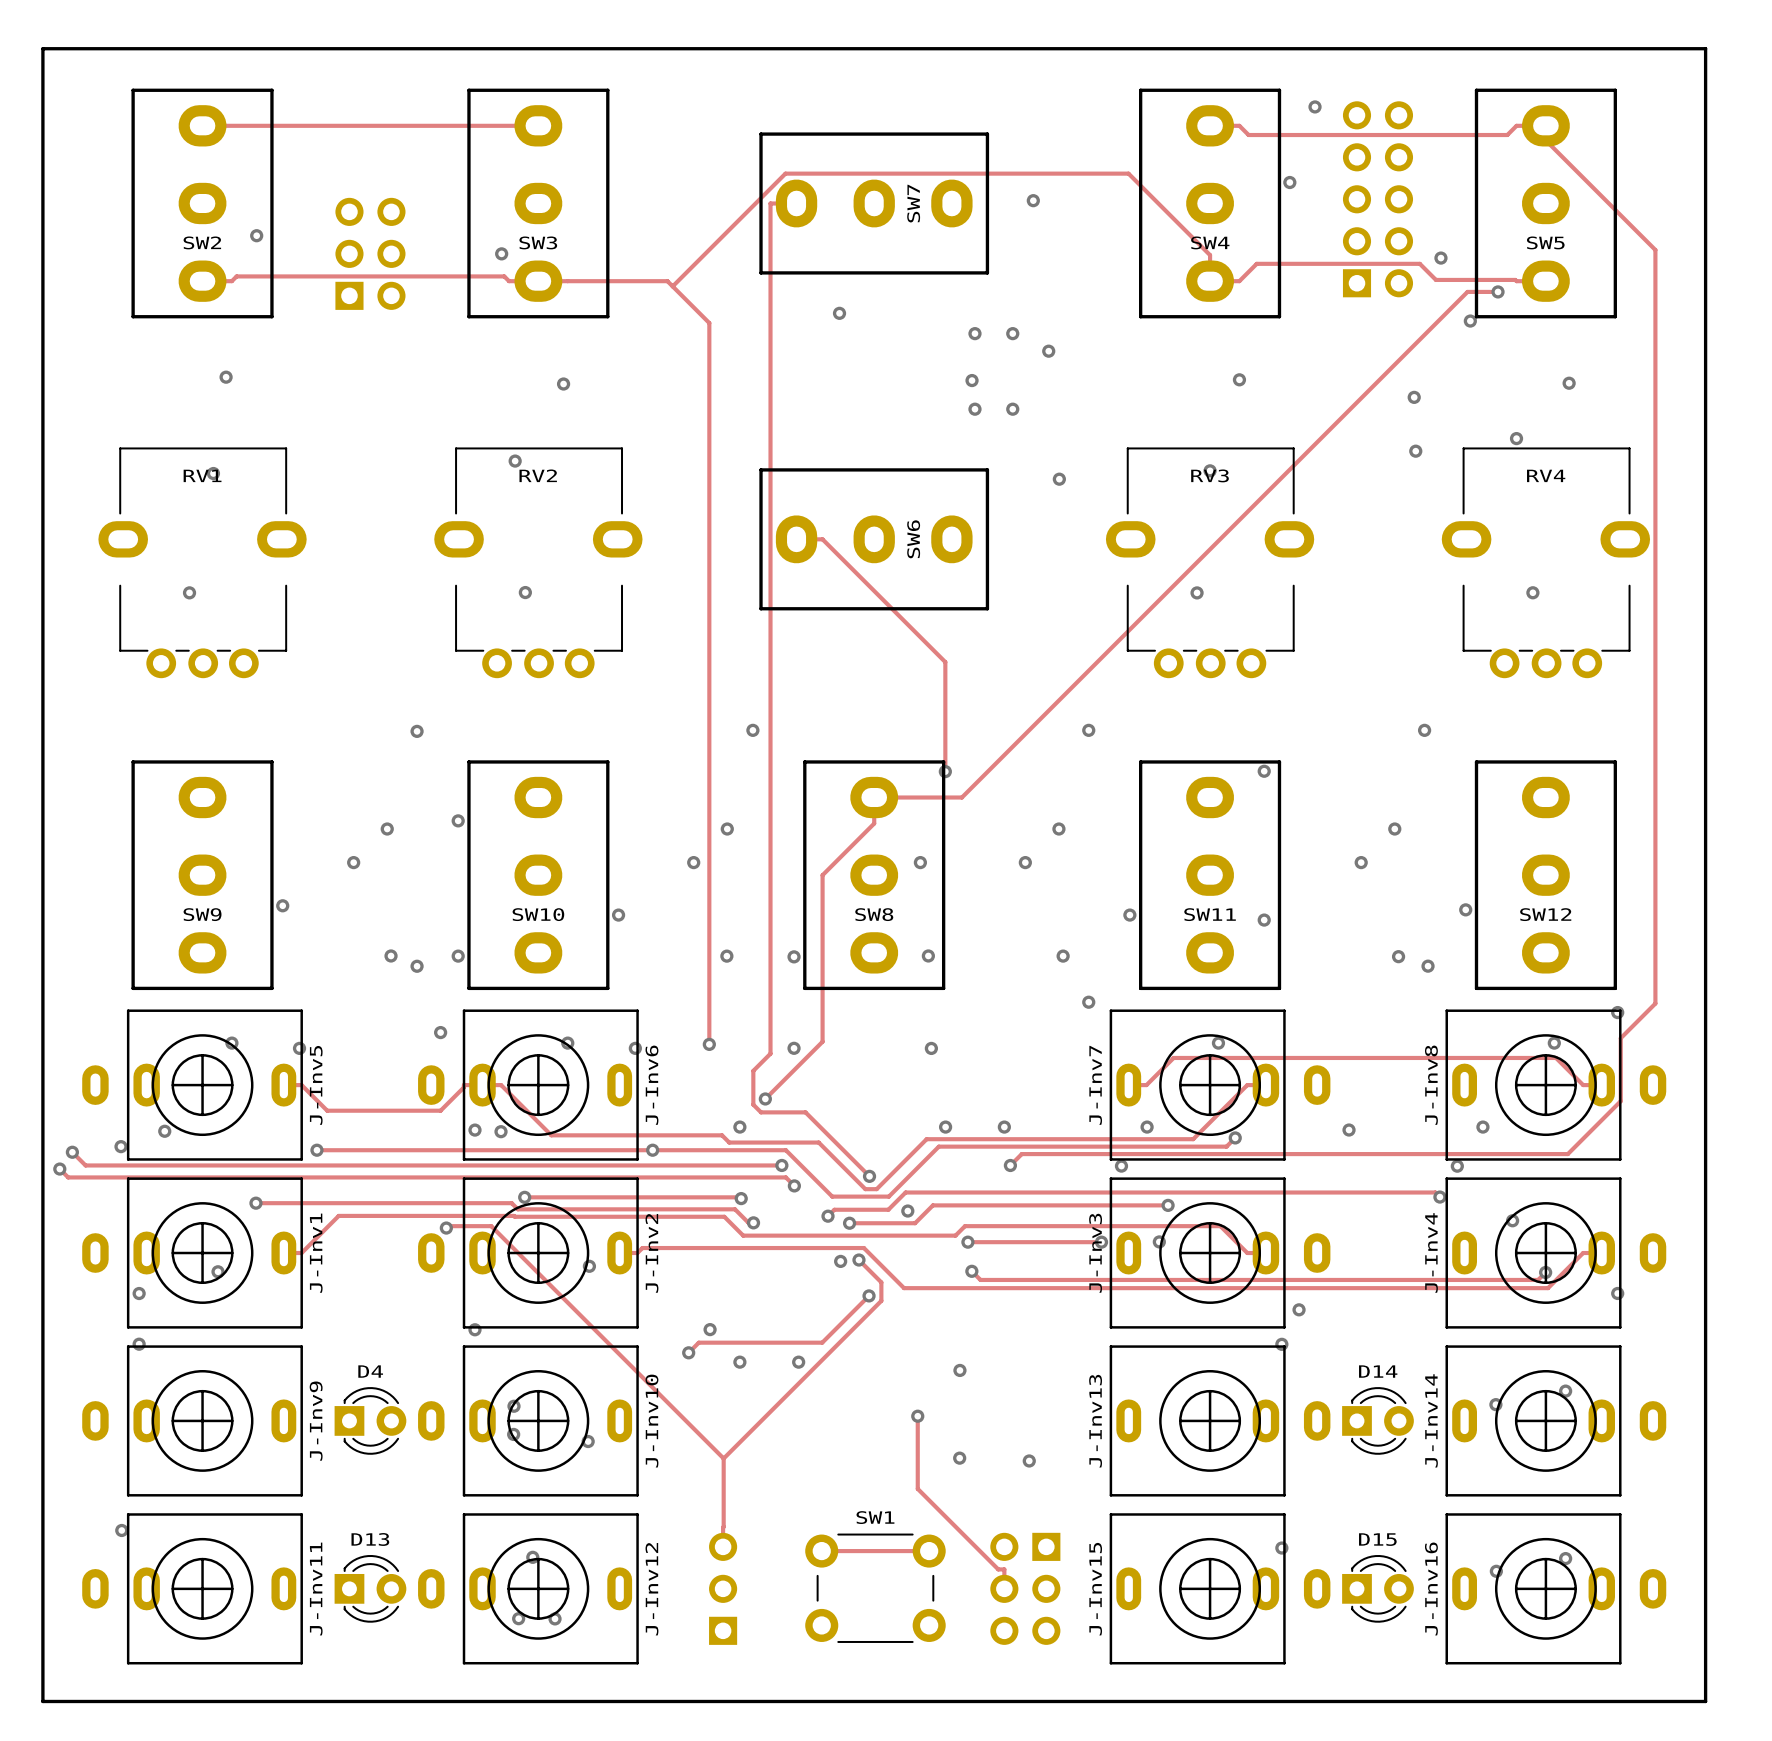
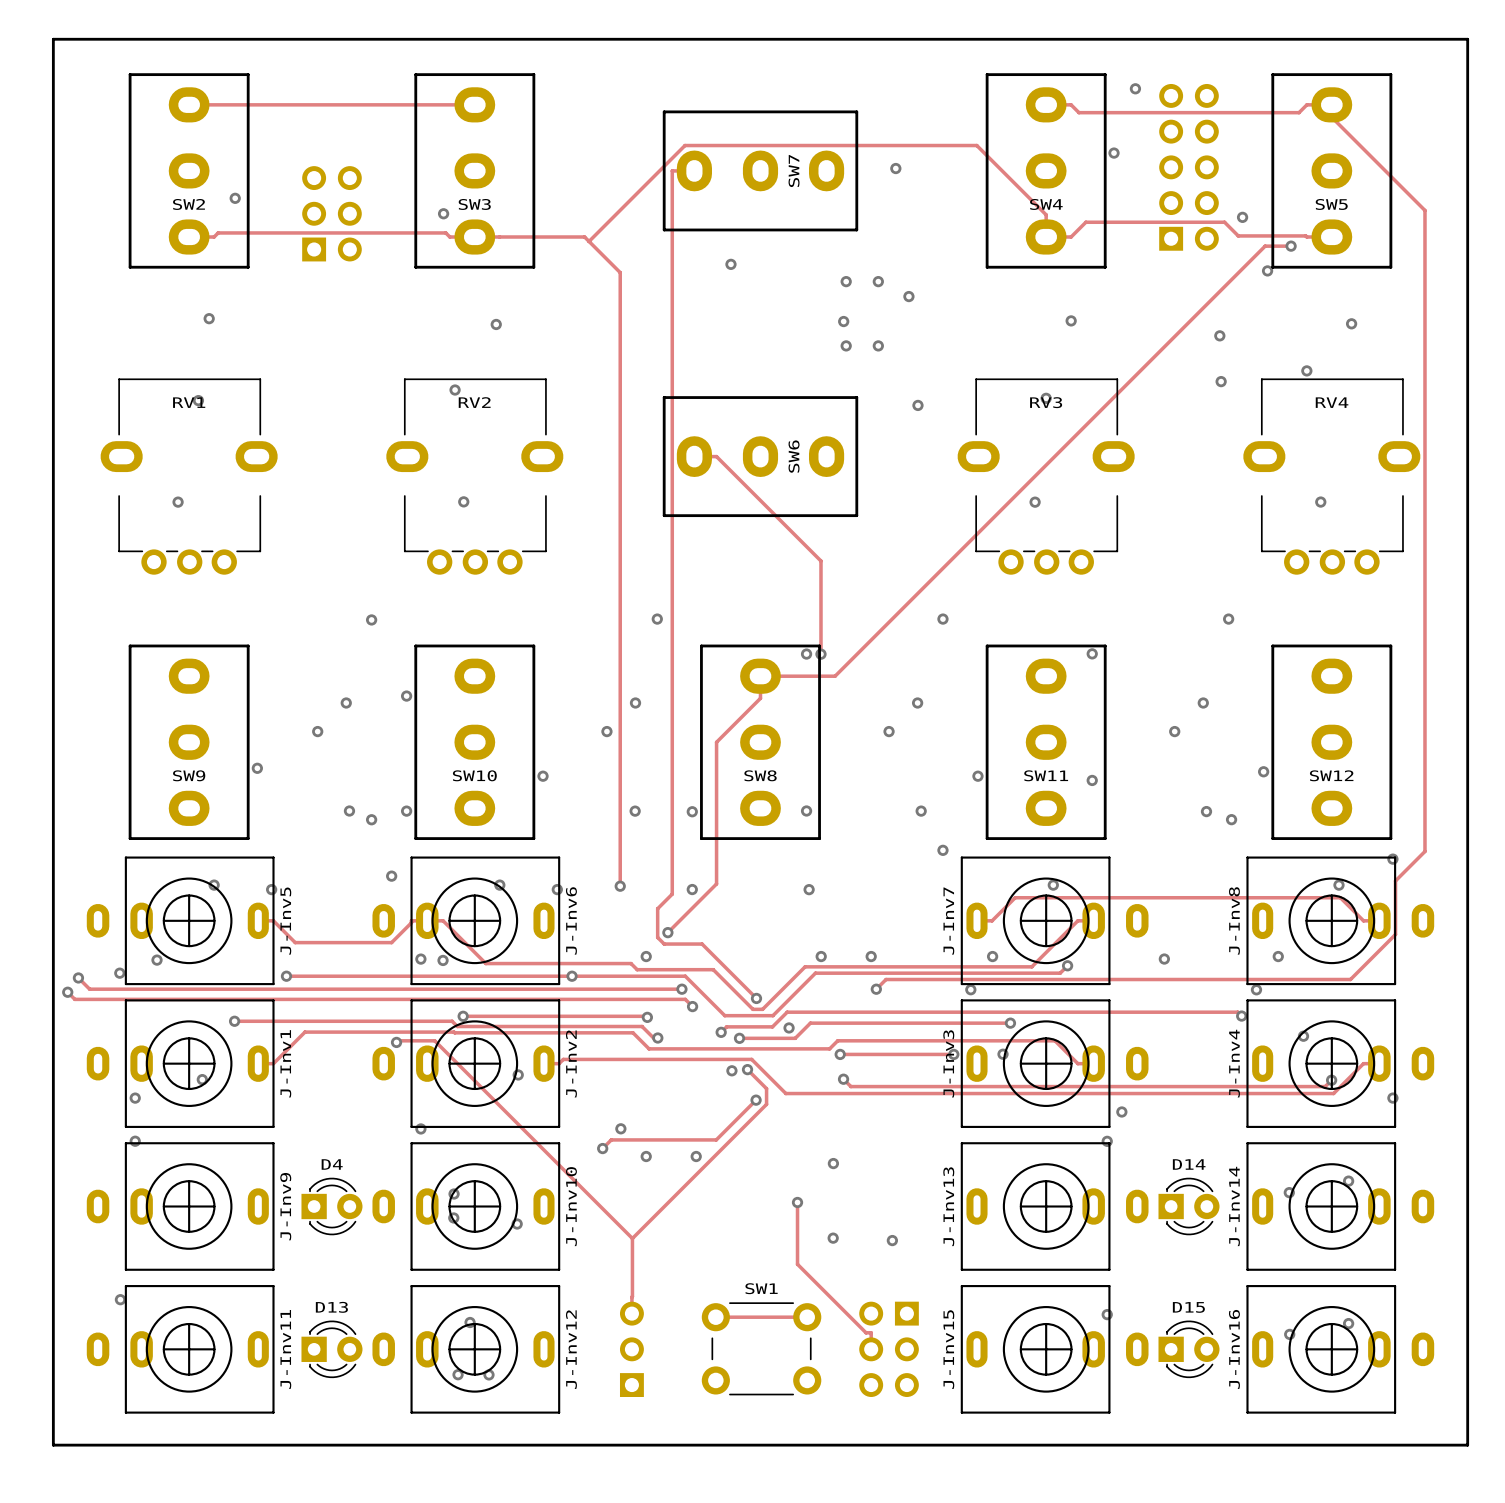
via position: (920, 862) -> (806, 654)

